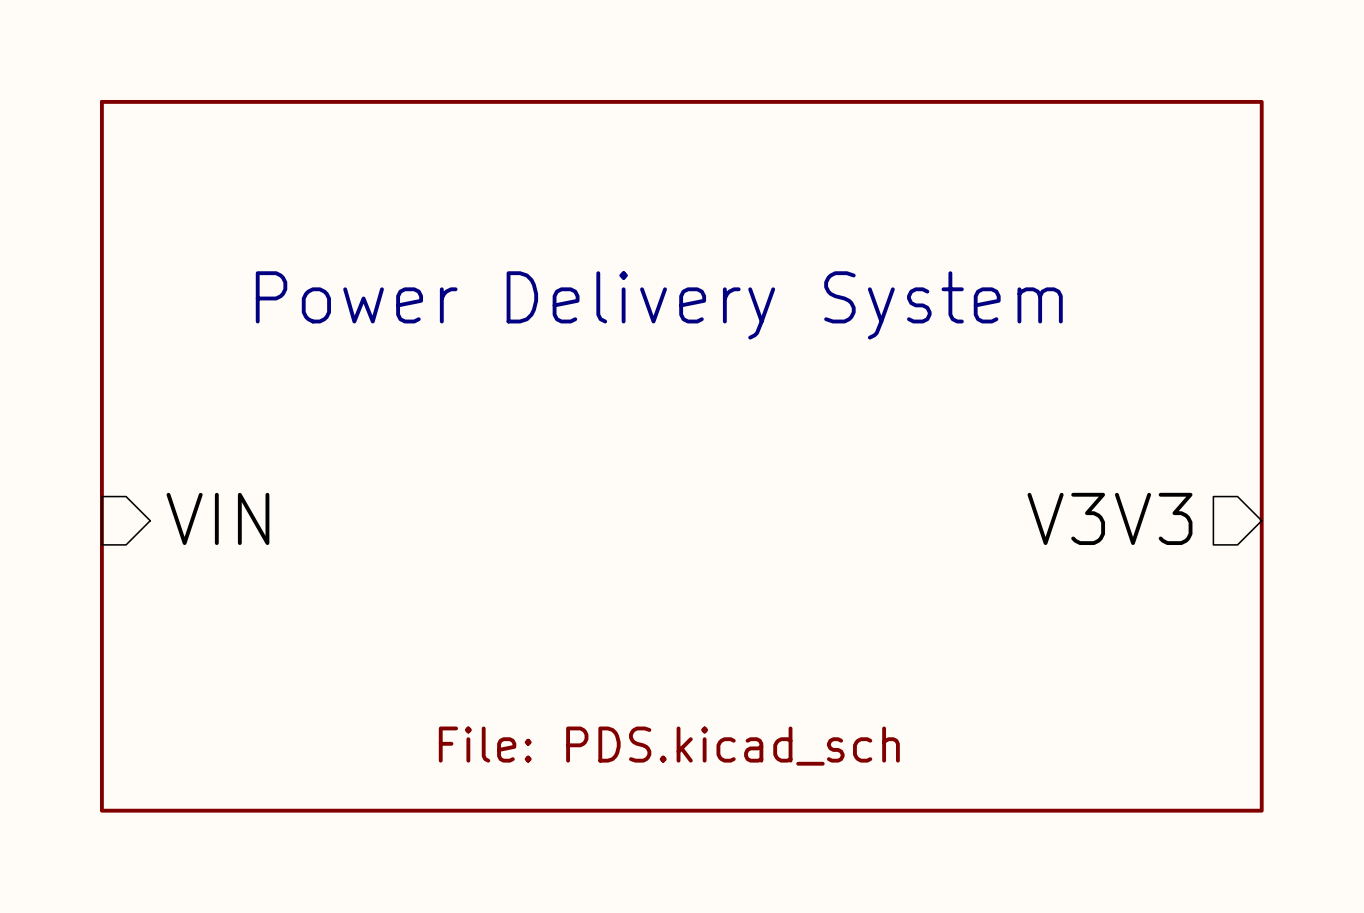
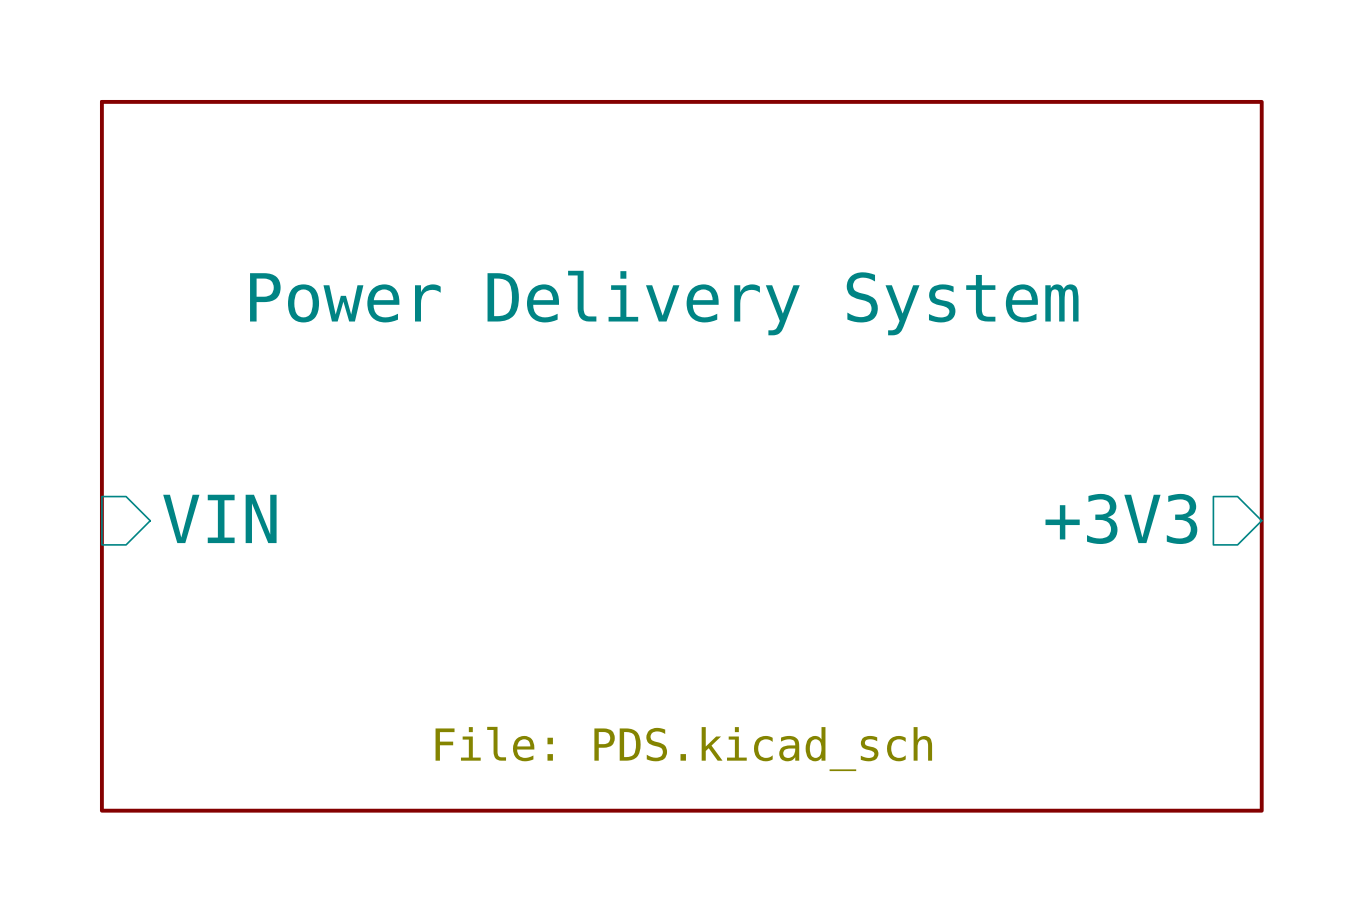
sheet pin: V3V3 (1109, 518) -> +3V3 (1121, 518)

